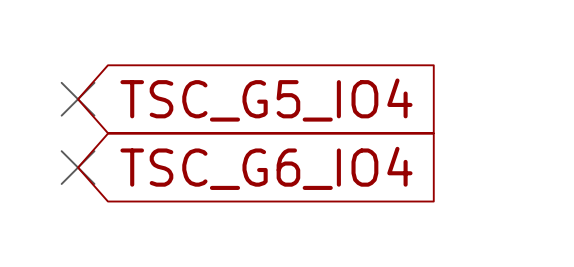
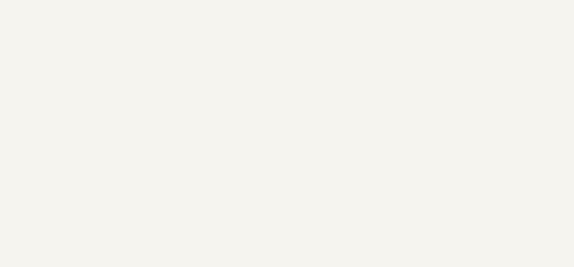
no-connect mark: (78, 99) -> none
global label: TSC_G5_IO4 (266, 100) -> none
no-connect mark: (78, 167) -> none
global label: TSC_G6_IO4 (266, 168) -> none

